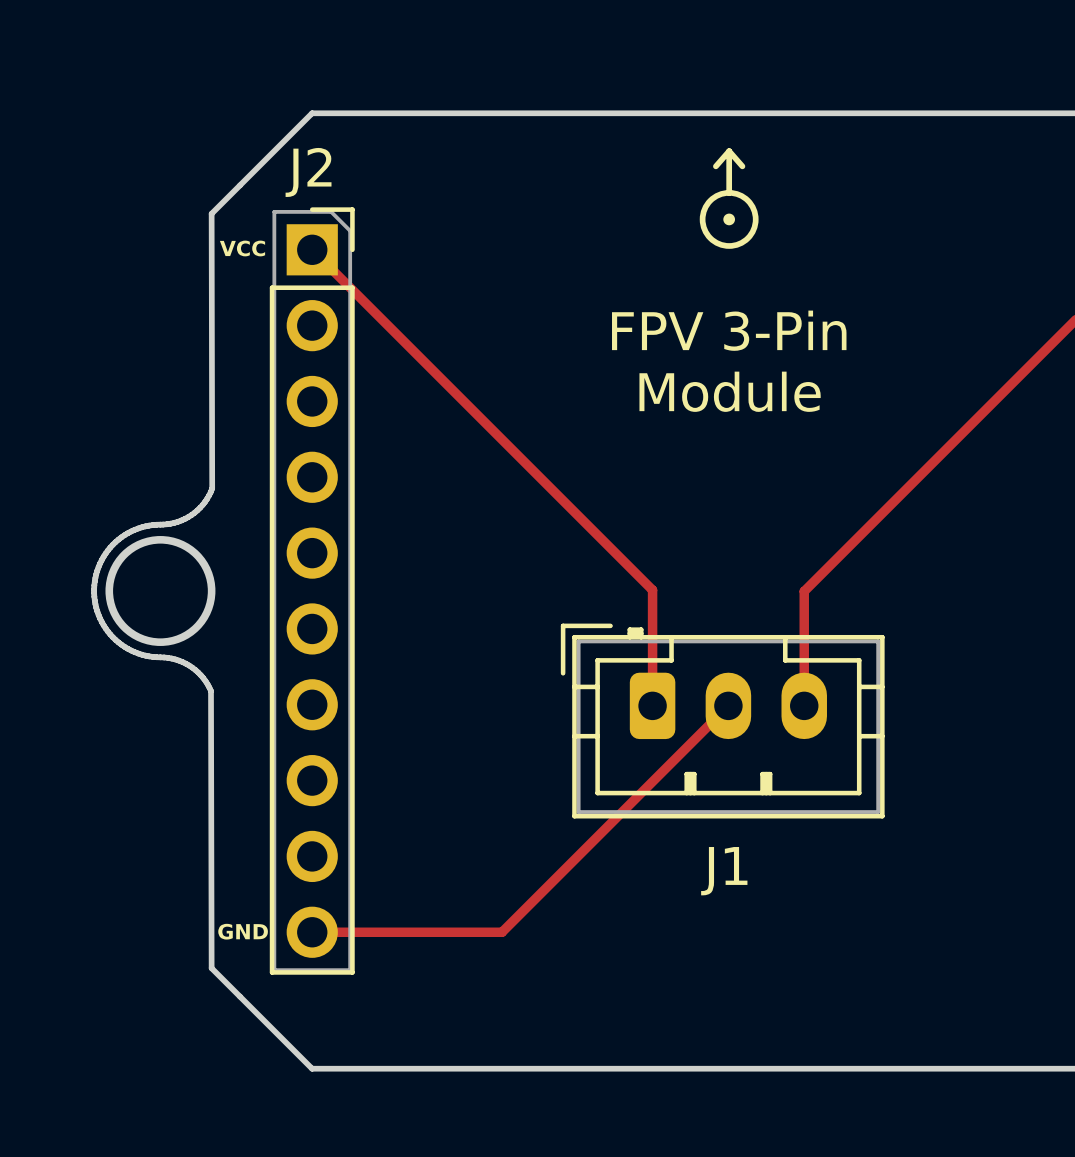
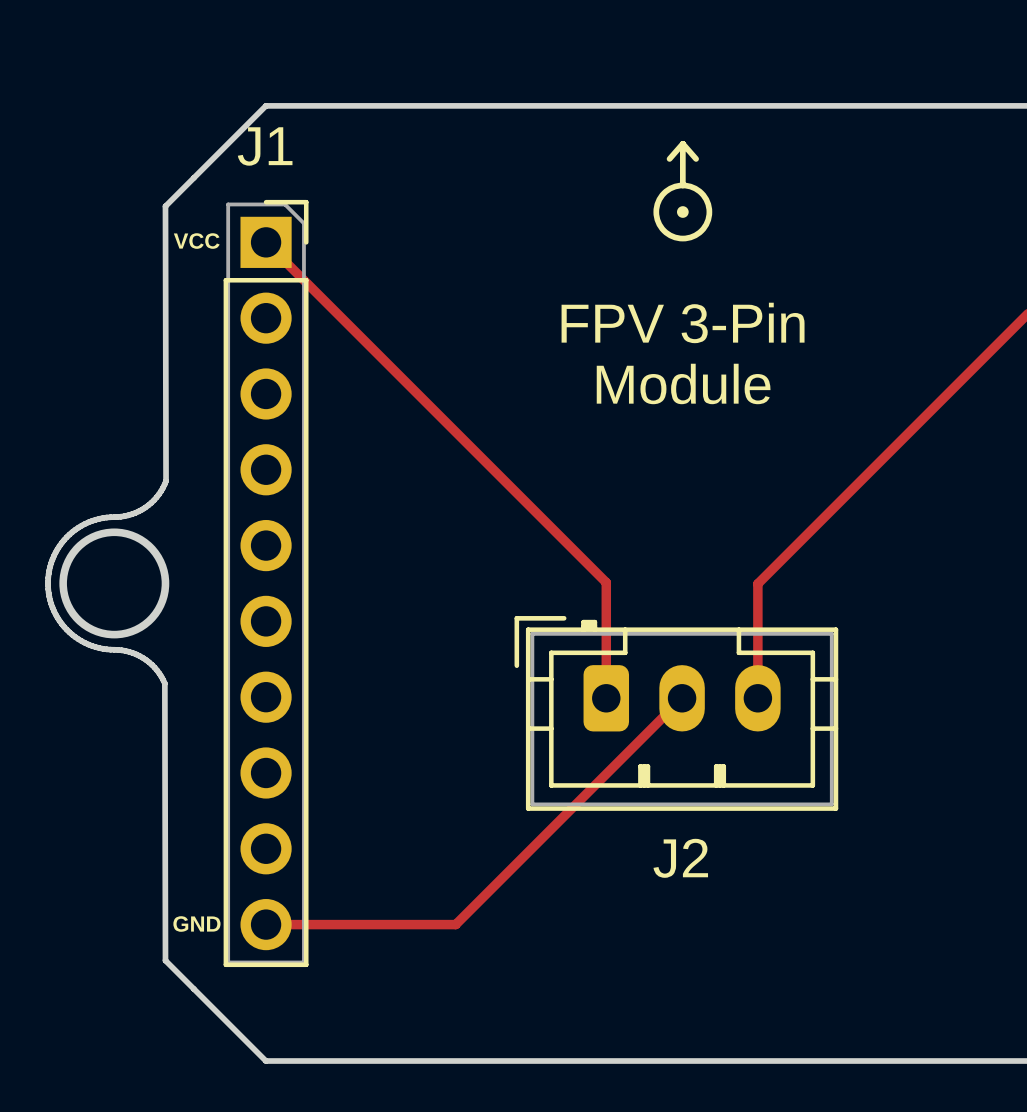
J2 name: J2 (308, 172) -> J1 (265, 146)
J1 name: J1 (724, 871) -> J2 (680, 858)

